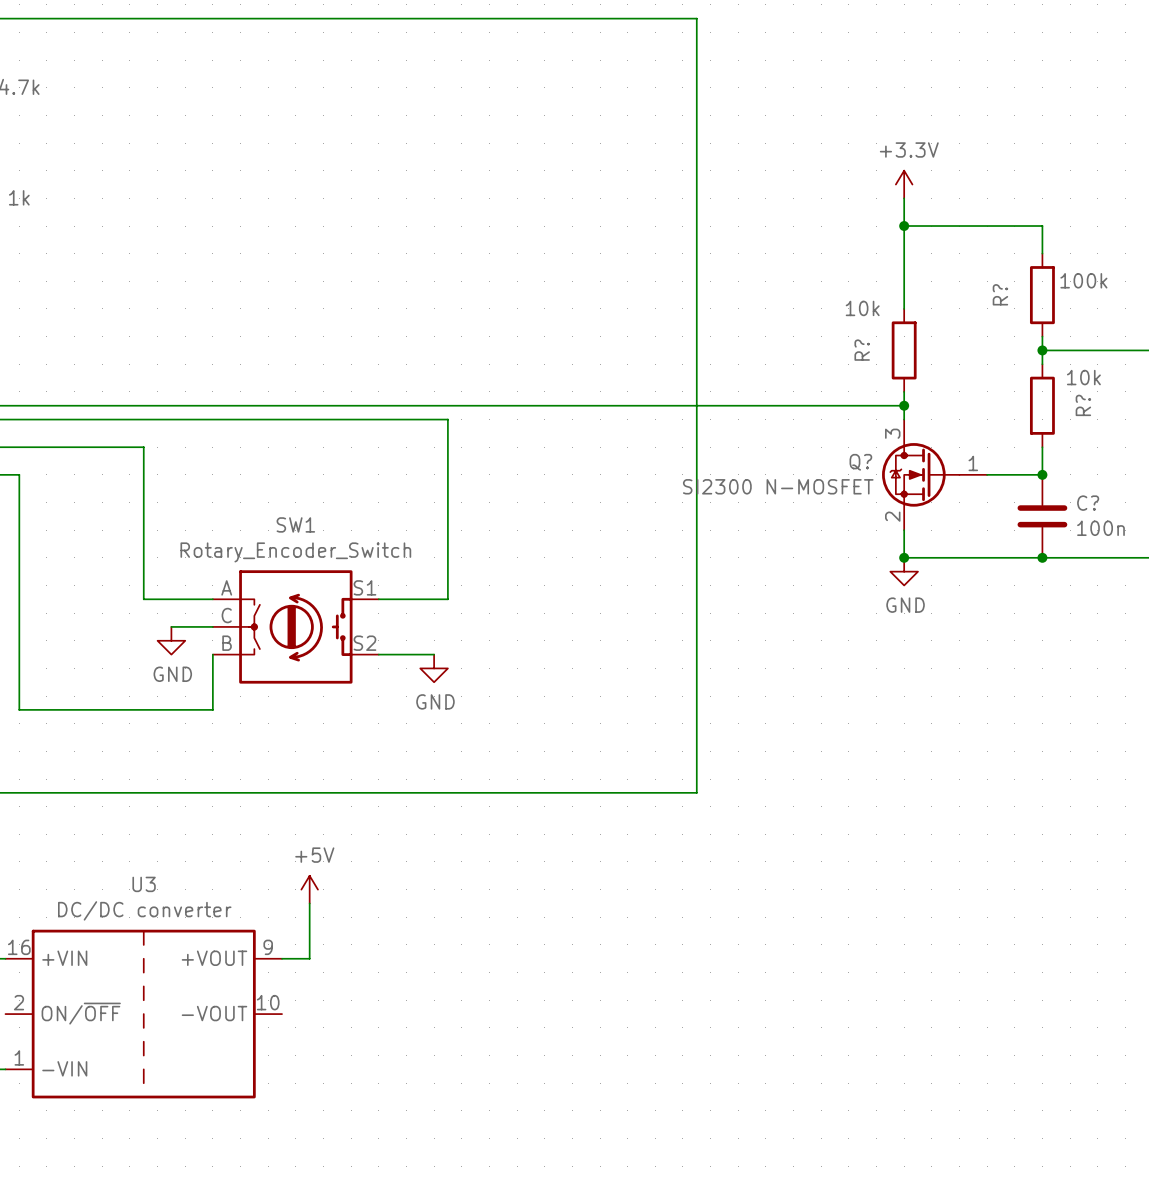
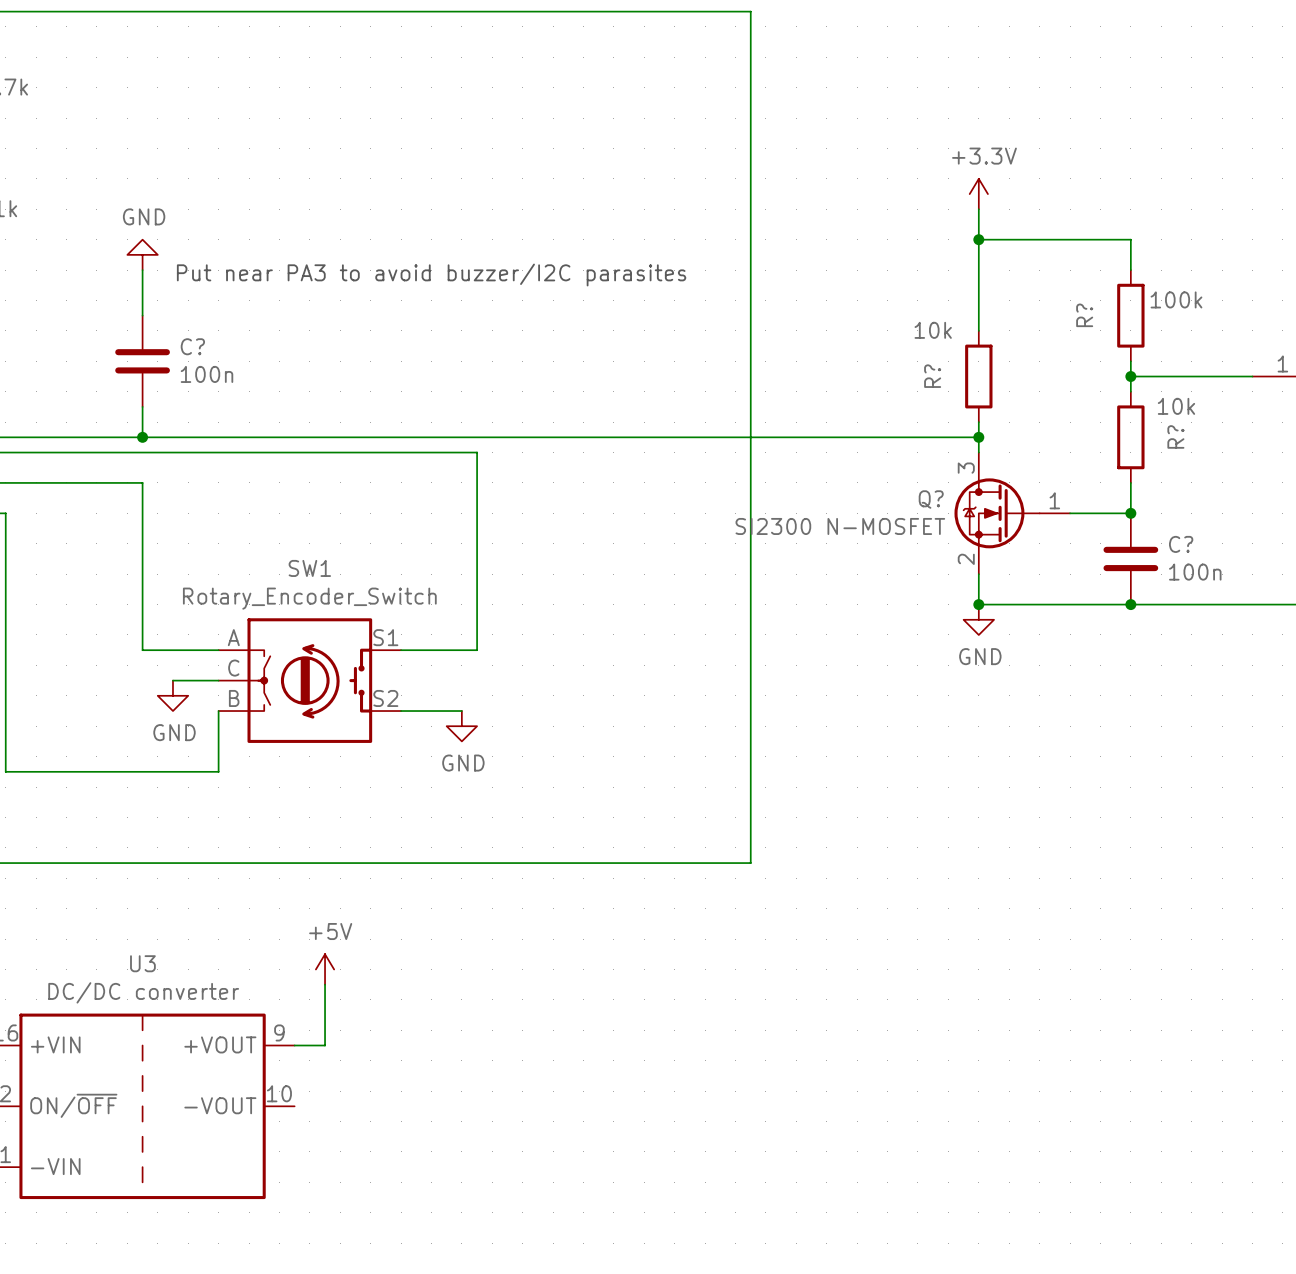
power symbol: none -> GND (142, 254)
wire: none -> (142, 270) (142, 315)
text: none -> Put near PA3 to avoid buzzer/I2C parasites (431, 275)
C?: none -> 100n (142, 361)
wire: none -> (142, 406) (142, 437)
junction: none -> (142, 437)

